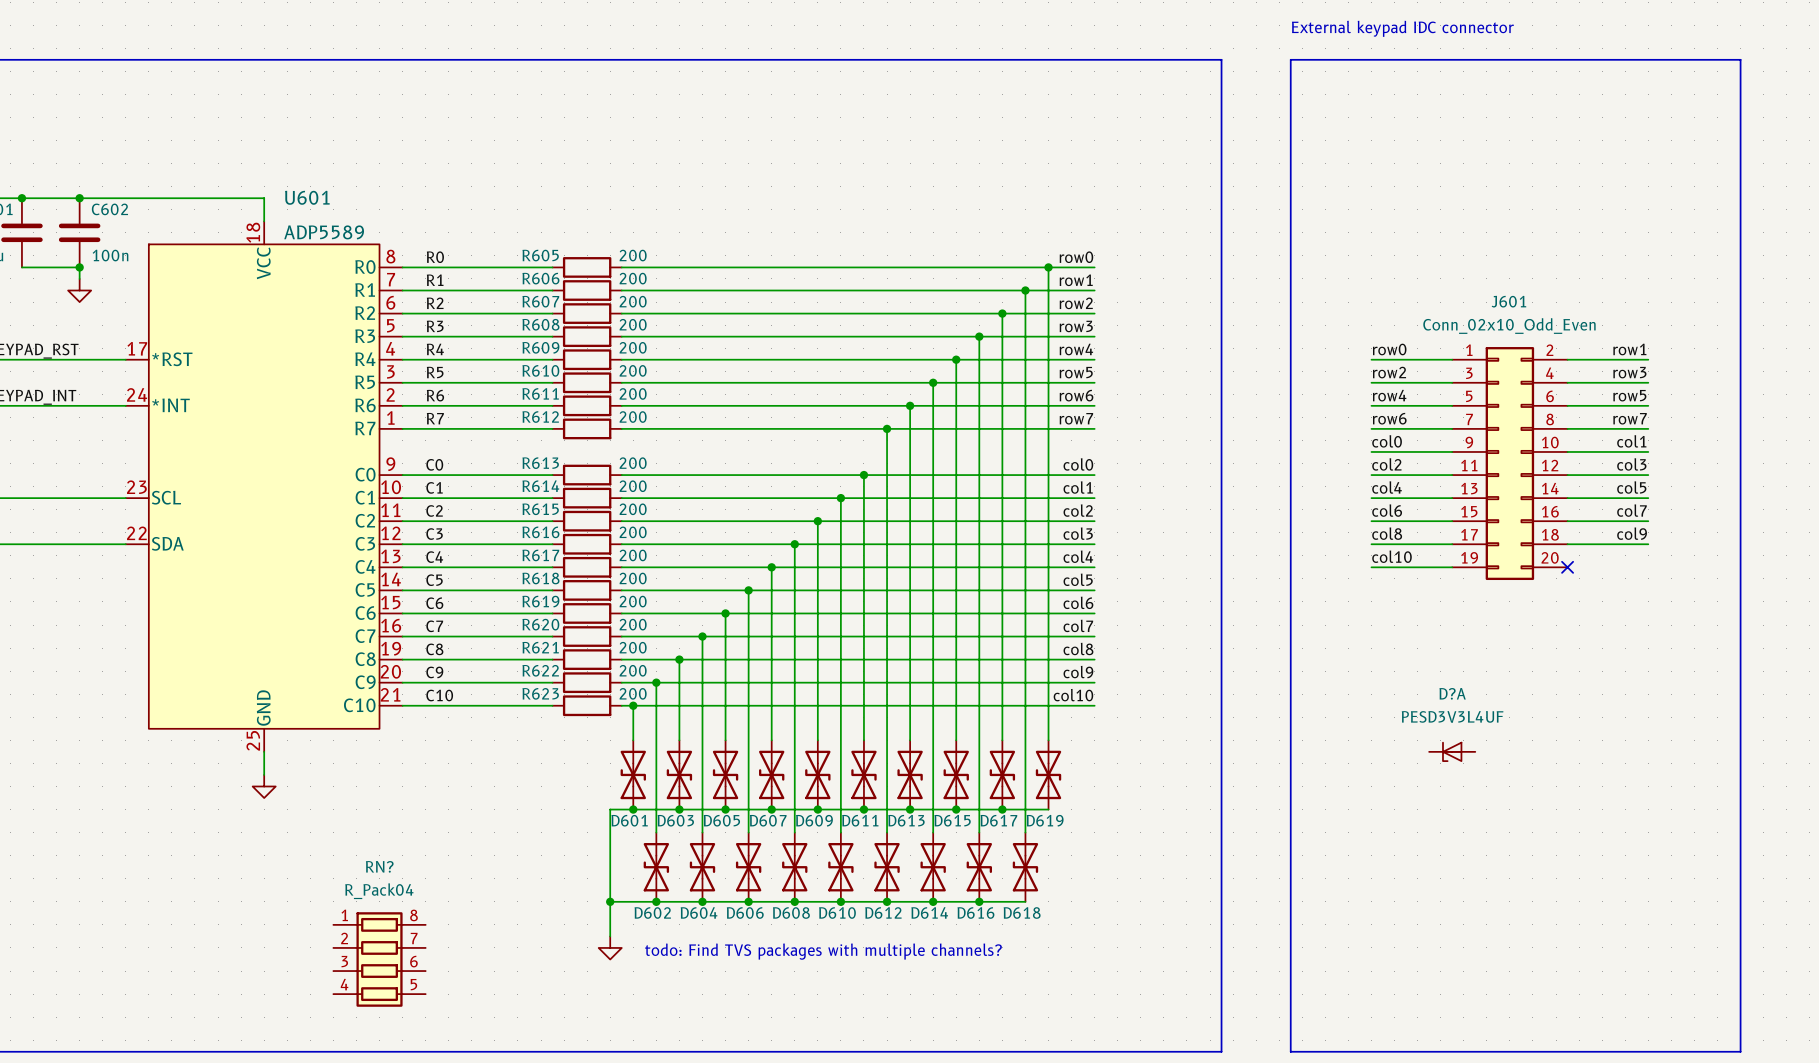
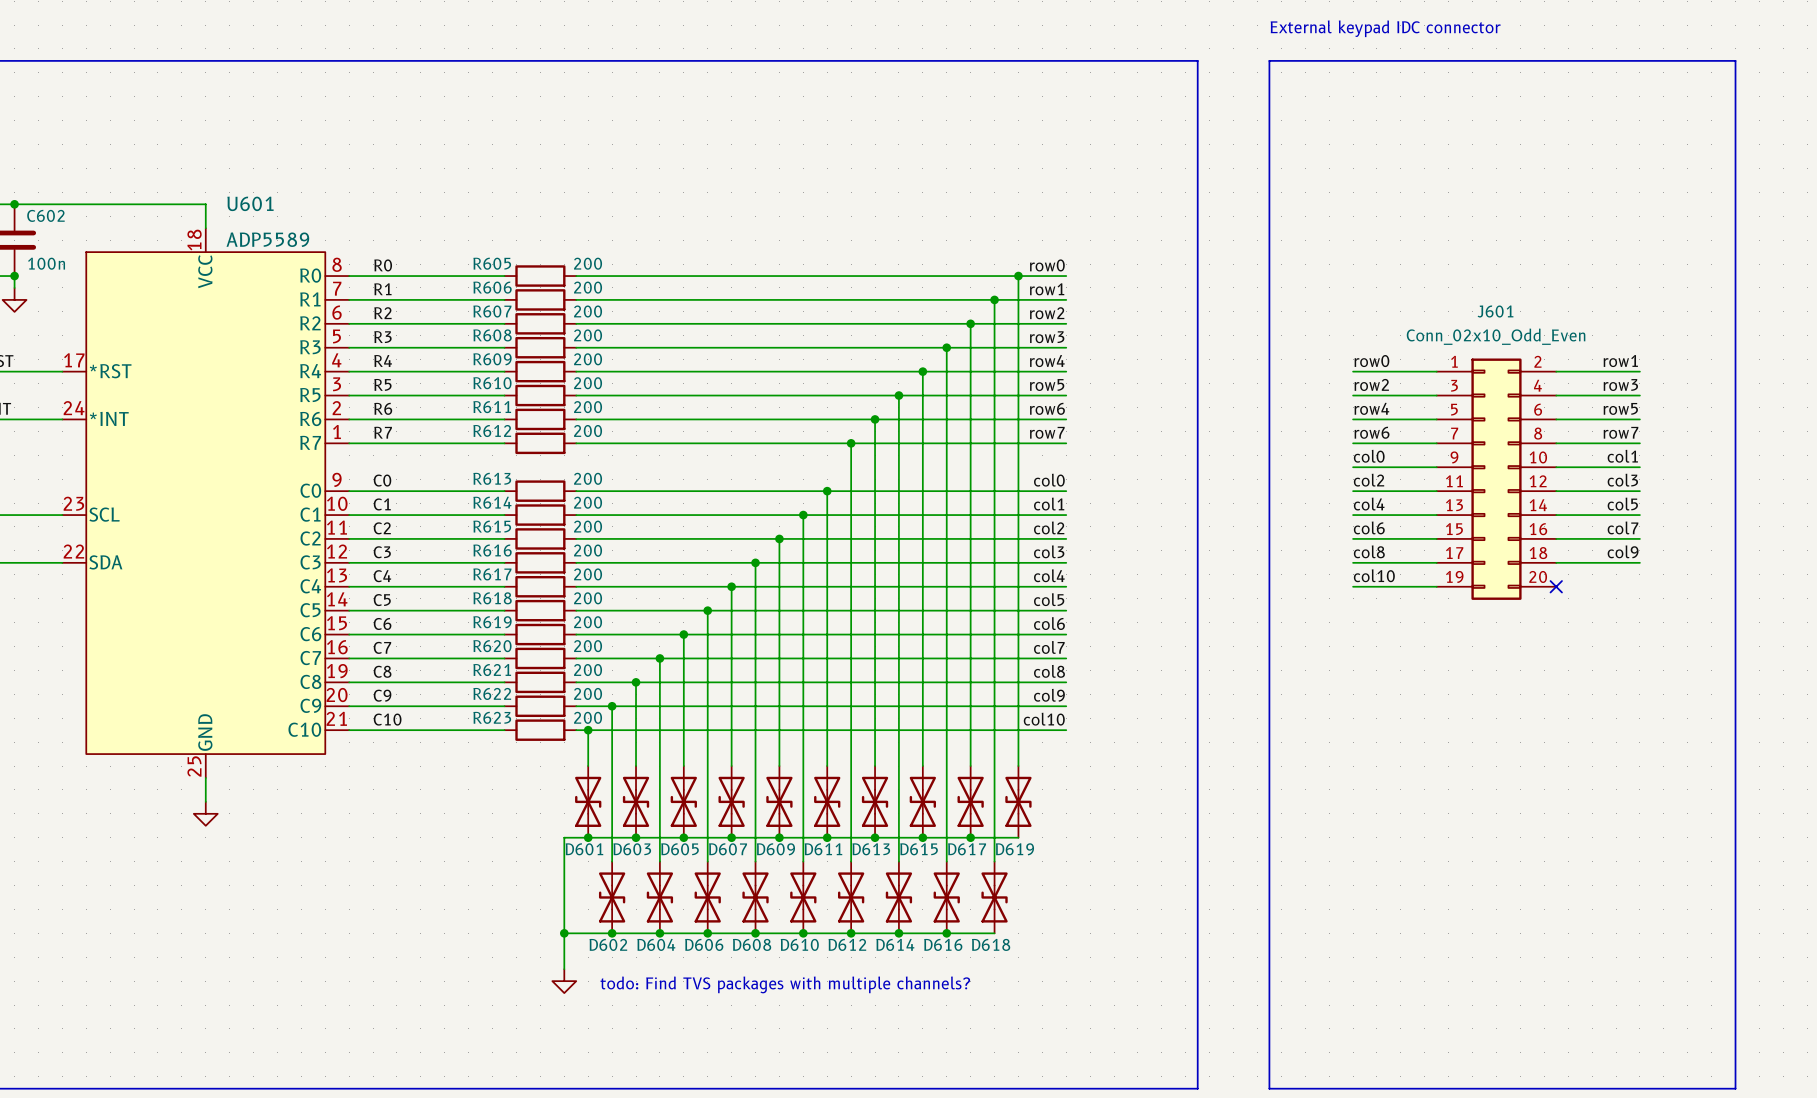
D?A: PESD3V3L4UF (1452, 751) -> none
RN?: R_Pack04 (379, 959) -> none

